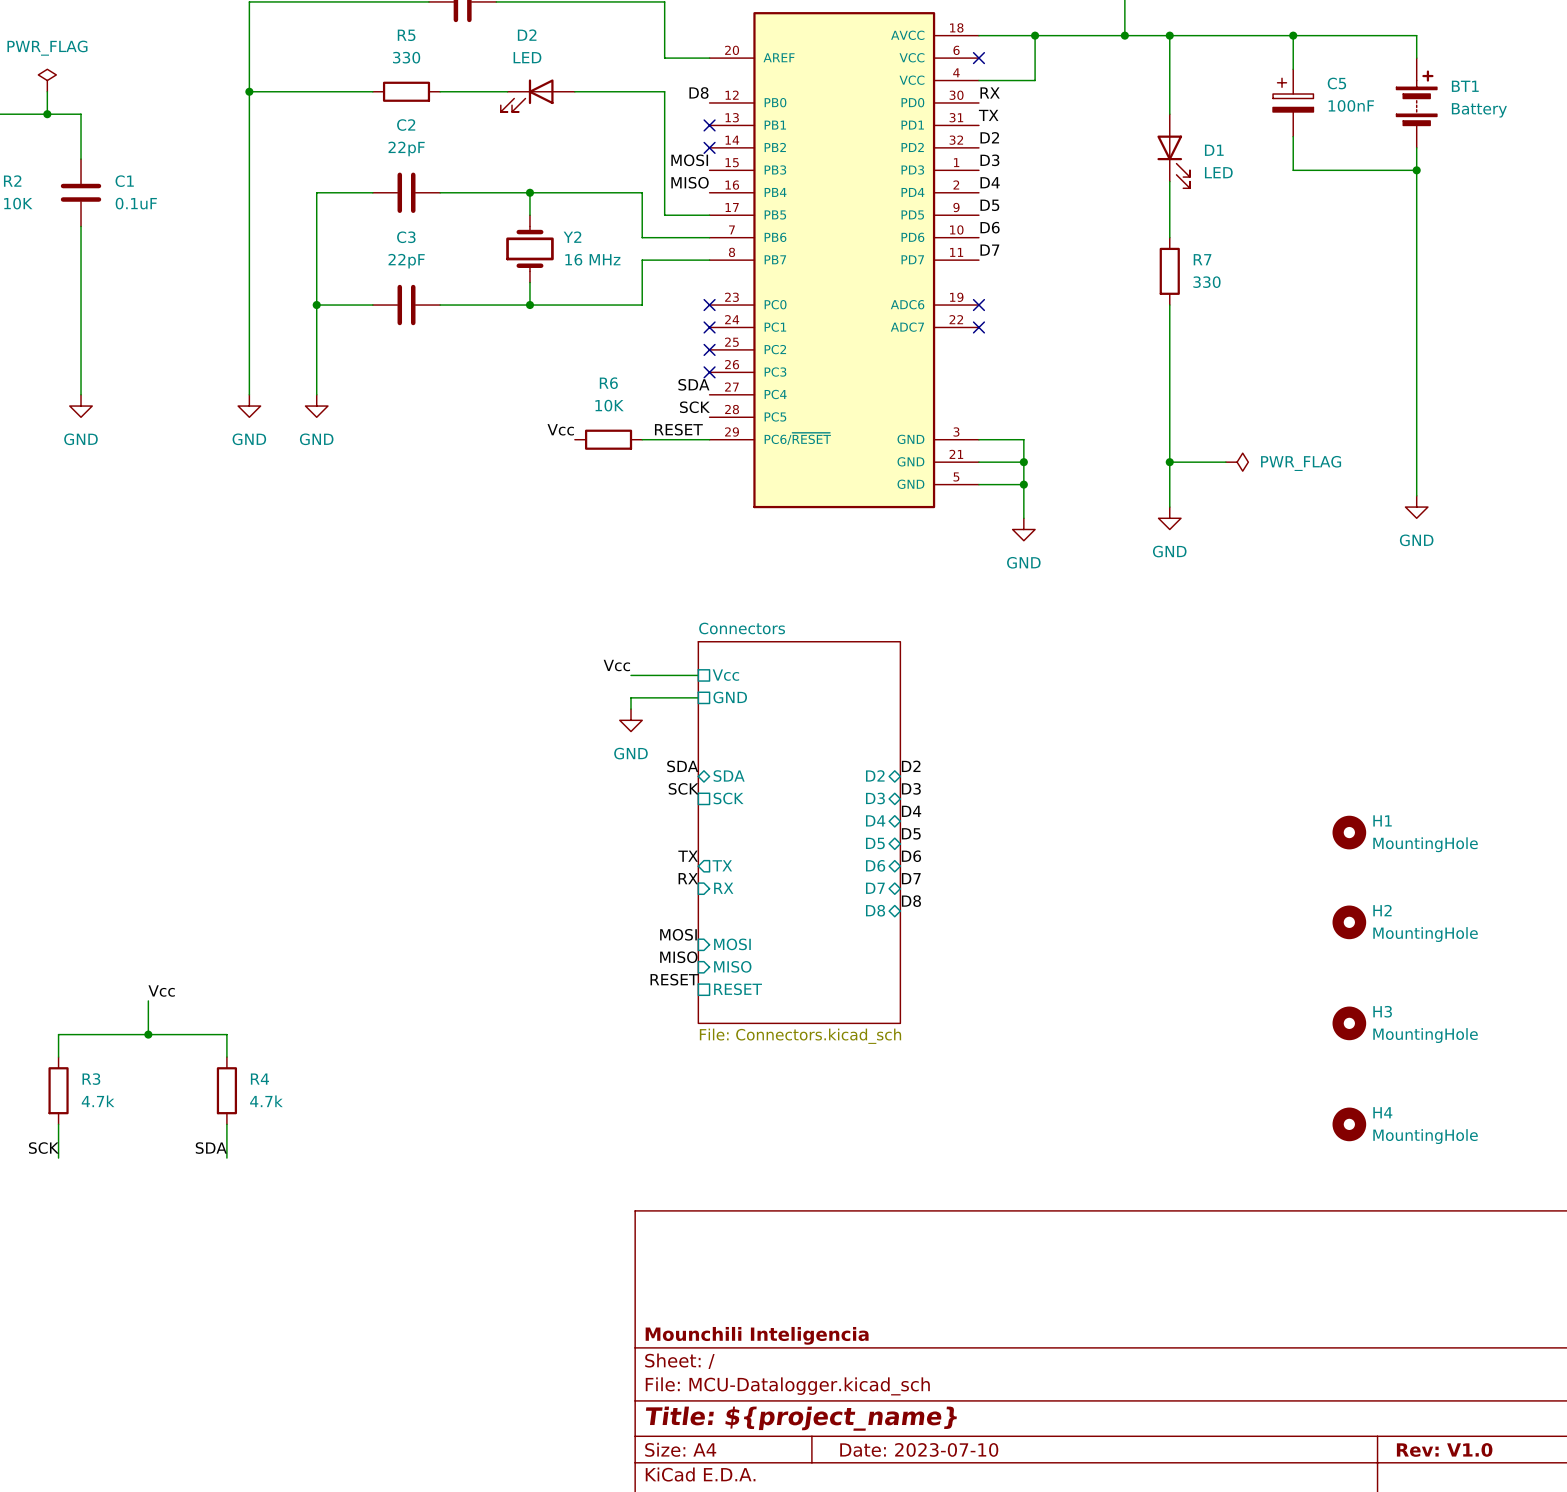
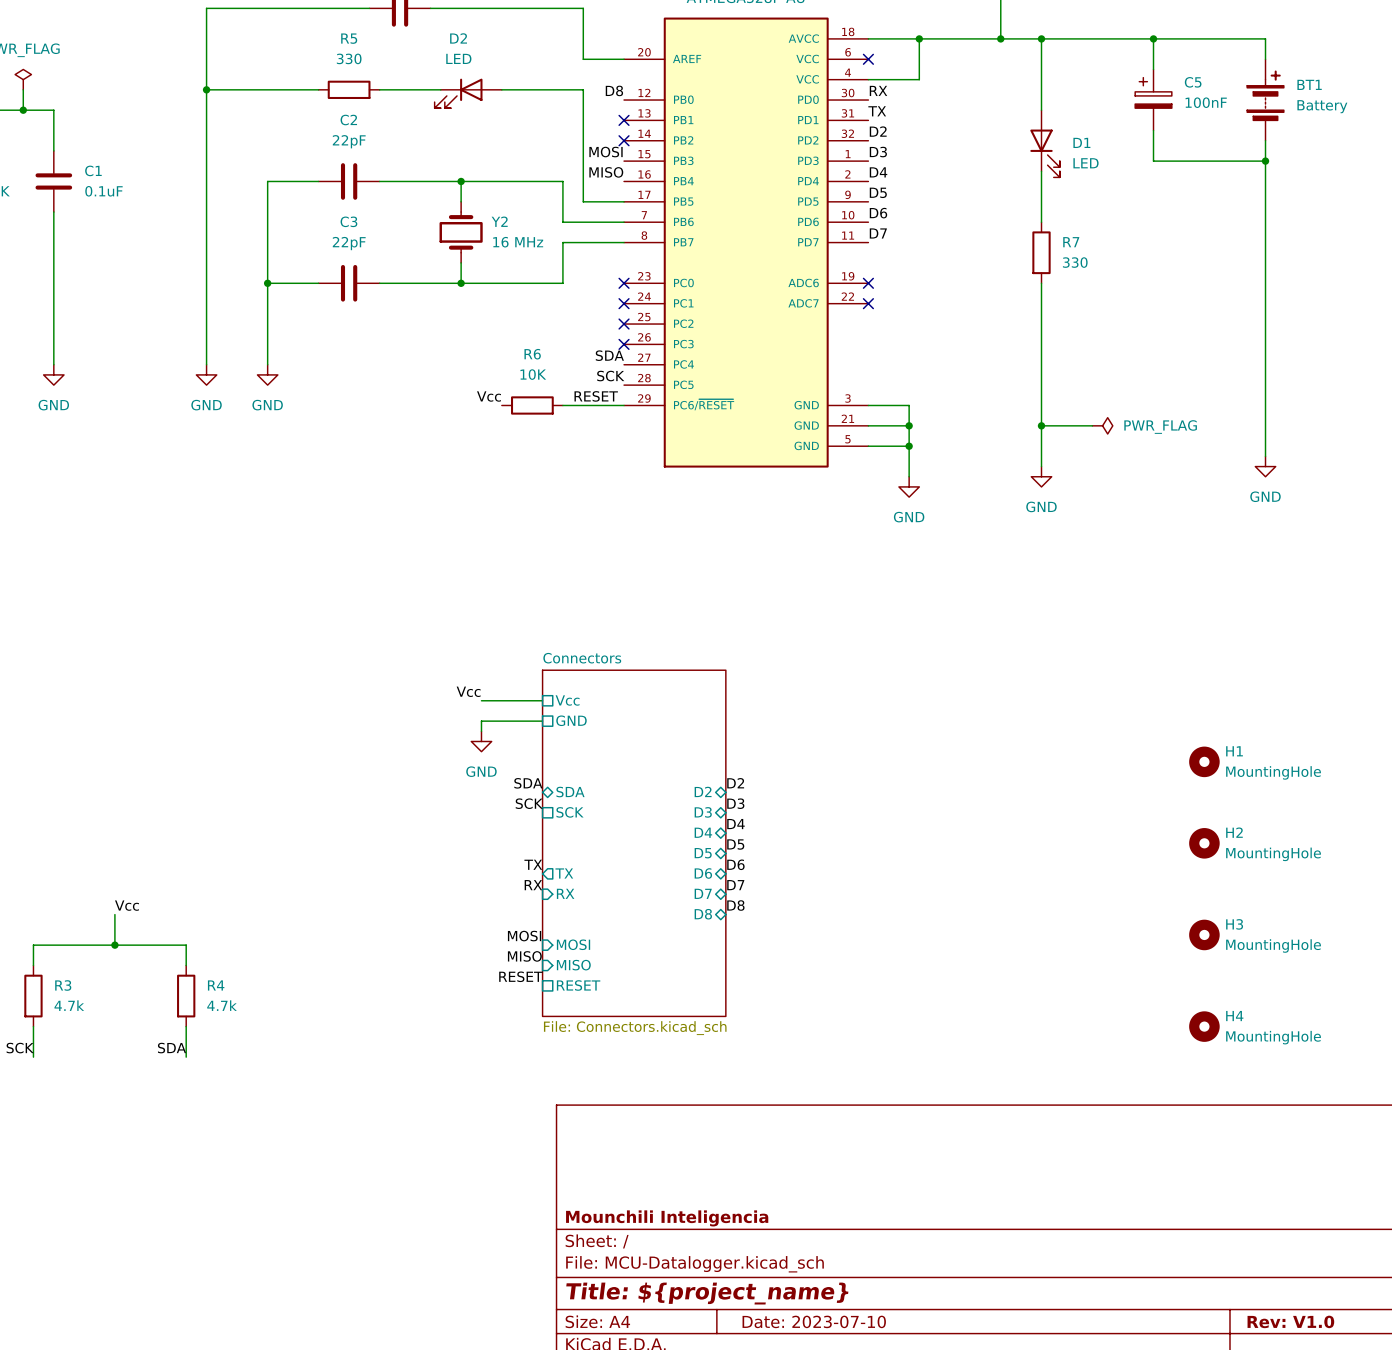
label position: Vcc (616, 665) -> Vcc (468, 691)
wire: (631, 675) (698, 675) -> (481, 700) (542, 700)
sheet pin position: Vcc (725, 675) -> Vcc (567, 700)
wire: (698, 697) (631, 697) (631, 709) -> (542, 721) (481, 721) (481, 731)
sheet pin position: GND (730, 697) -> GND (571, 720)
power symbol position: GND (631, 720) -> GND (481, 741)
label position: SDA (682, 766) -> SDA (528, 783)
label position: D2 (911, 766) -> D2 (735, 783)
sheet pin position: D2 (875, 775) -> D2 (703, 791)
sheet pin position: SDA (729, 776) -> SDA (570, 792)
label position: SCK (683, 788) -> SCK (529, 803)
label position: D3 (911, 788) -> D3 (735, 803)
sheet pin position: SCK (728, 798) -> SCK (570, 812)
sheet pin position: D3 (875, 798) -> D3 (703, 812)
label position: D4 (911, 811) -> D4 (735, 824)
sheet pin position: D4 (875, 820) -> D4 (703, 832)
sheet Connectors position: (799, 832) -> (634, 843)
label position: D5 (911, 833) -> D5 (735, 844)
sheet pin position: D5 (875, 843) -> D5 (703, 853)
label position: TX (688, 856) -> TX (533, 864)
label position: D6 (911, 856) -> D6 (735, 864)
sheet pin position: TX (722, 865) -> TX (564, 873)
sheet pin position: D6 (875, 865) -> D6 (703, 873)
label position: RX (688, 878) -> RX (533, 885)
label position: D7 (911, 878) -> D7 (735, 885)
sheet pin position: RX (723, 888) -> RX (565, 893)
sheet pin position: D7 (875, 888) -> D7 (703, 893)
label position: D8 (911, 901) -> D8 (735, 905)
sheet pin position: D8 (875, 910) -> D8 (703, 914)
label position: MOSI (678, 934) -> MOSI (524, 936)
sheet pin position: MOSI (732, 944) -> MOSI (573, 944)
label position: MISO (678, 957) -> MISO (524, 956)
sheet pin position: MISO (732, 966) -> MISO (573, 965)
label position: RESET (674, 979) -> RESET (520, 976)
sheet pin position: RESET (738, 989) -> RESET (578, 985)

